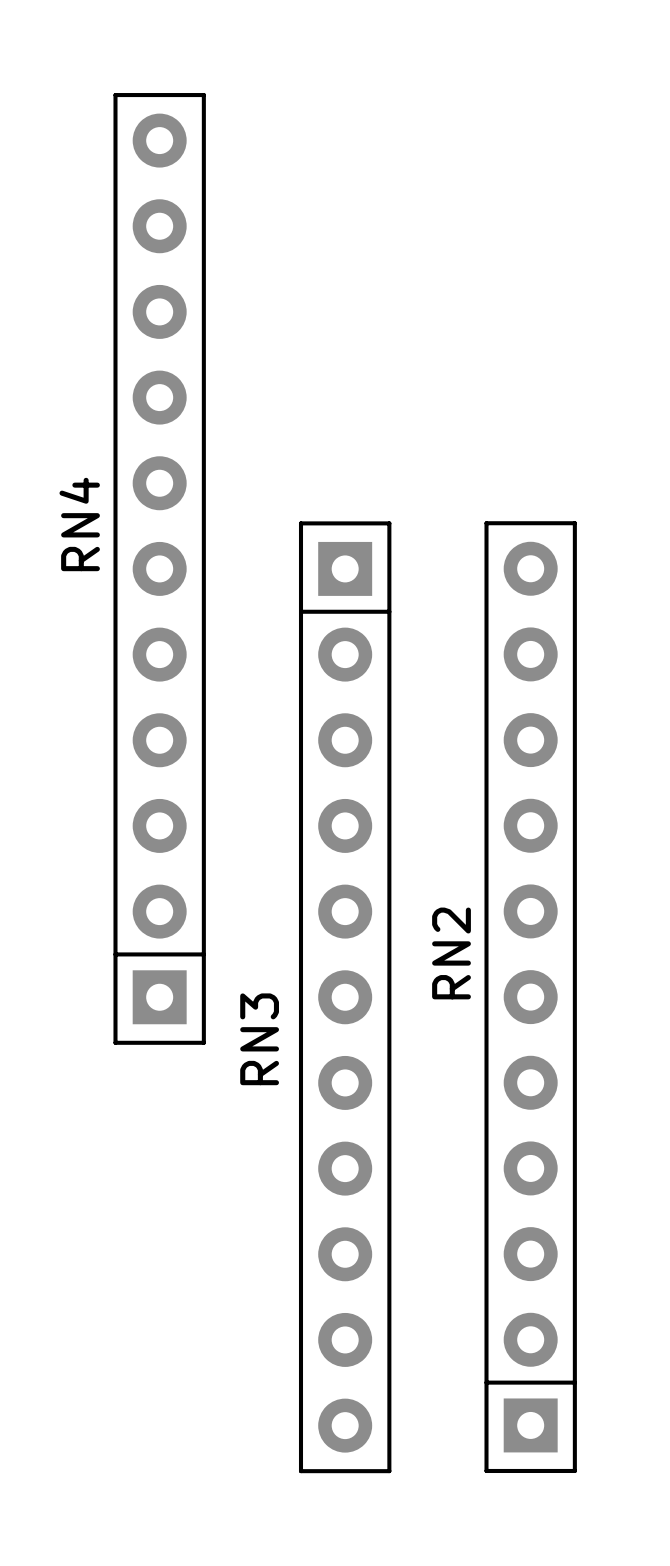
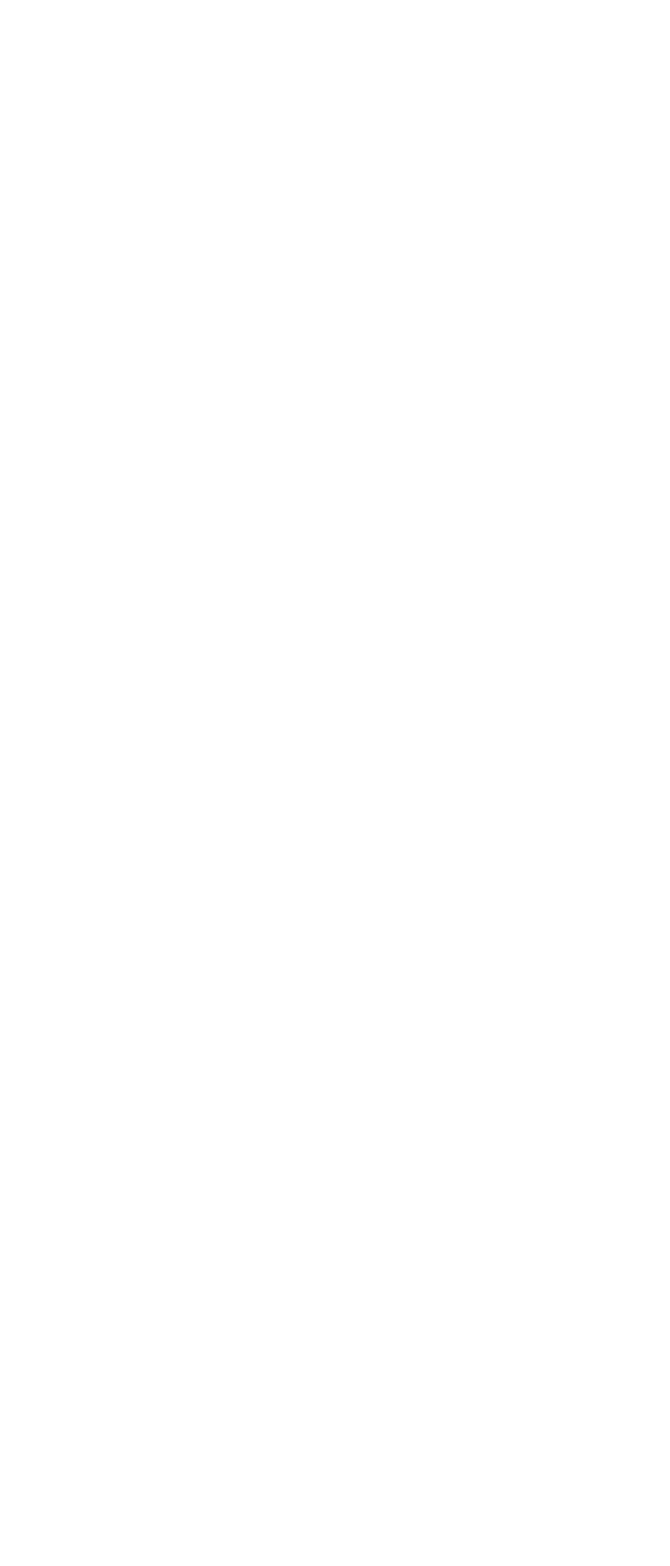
RN4: (159, 568) -> none
RN3: (345, 997) -> none
RN2: (530, 997) -> none

